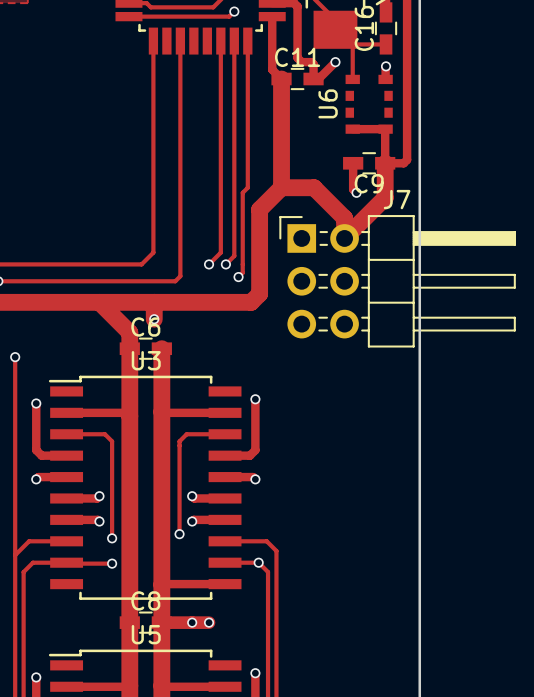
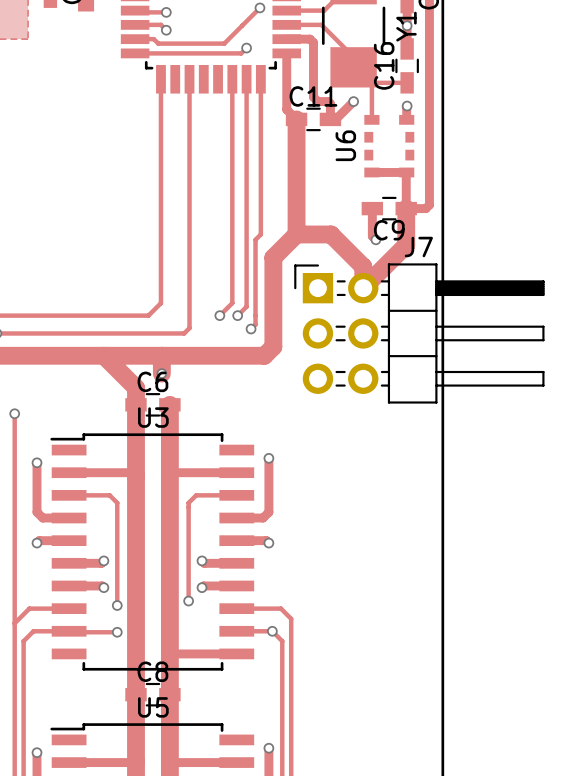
track: (161, 622) (209, 622) -> none
via: (192, 622) -> none
via: (209, 622) -> none

